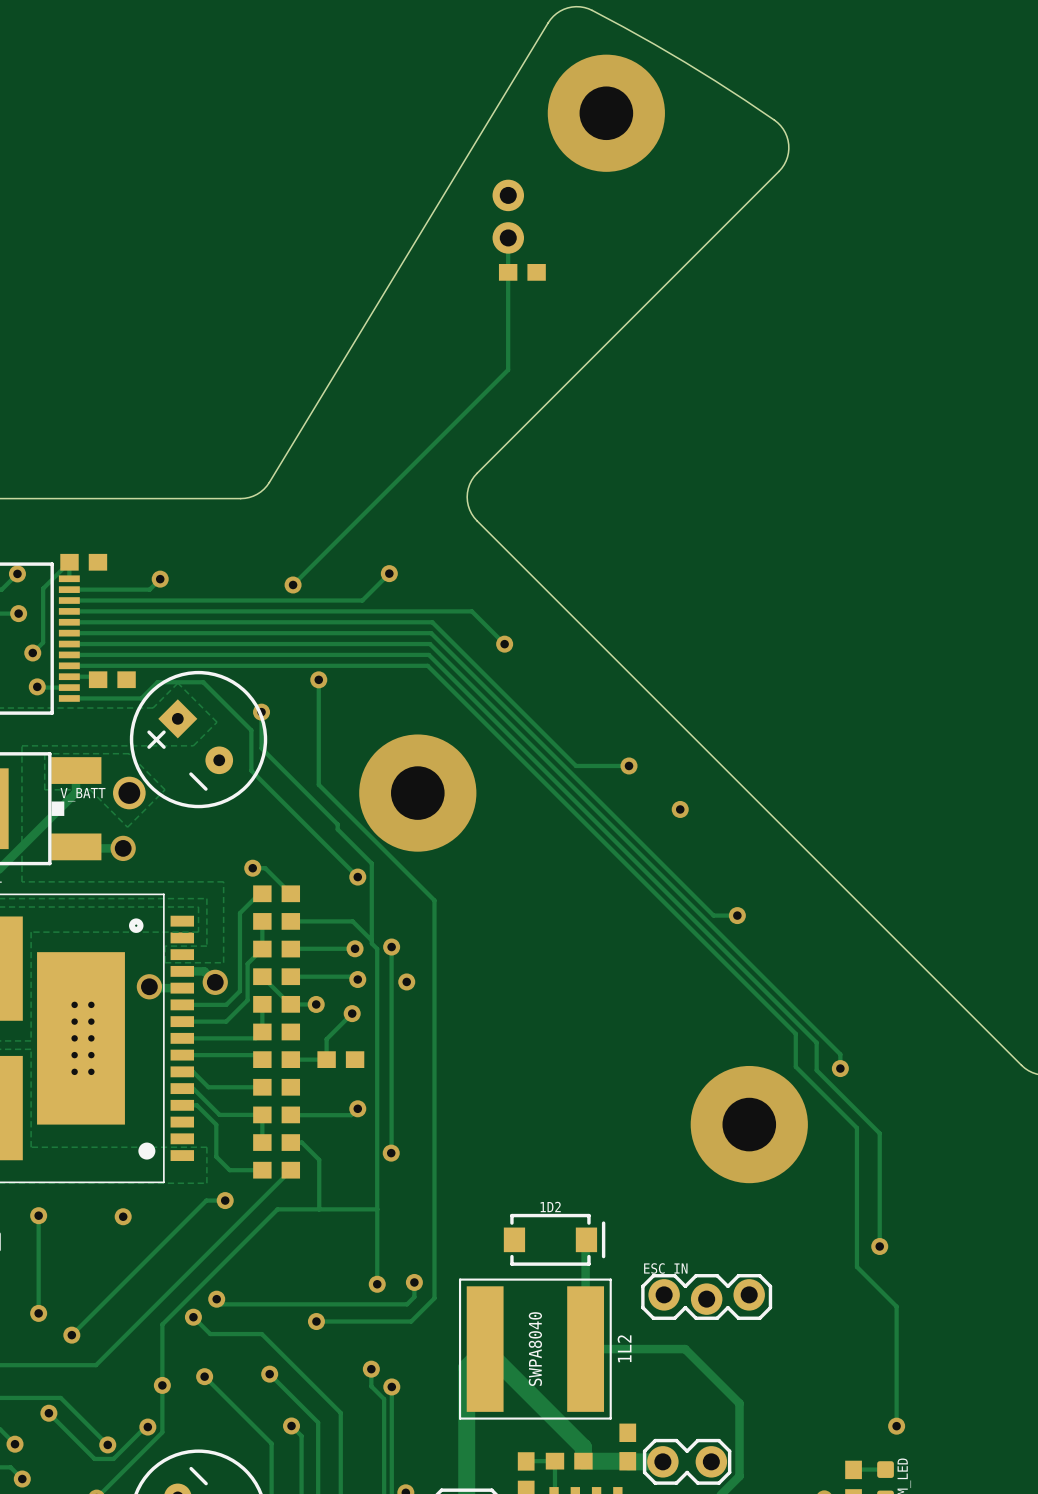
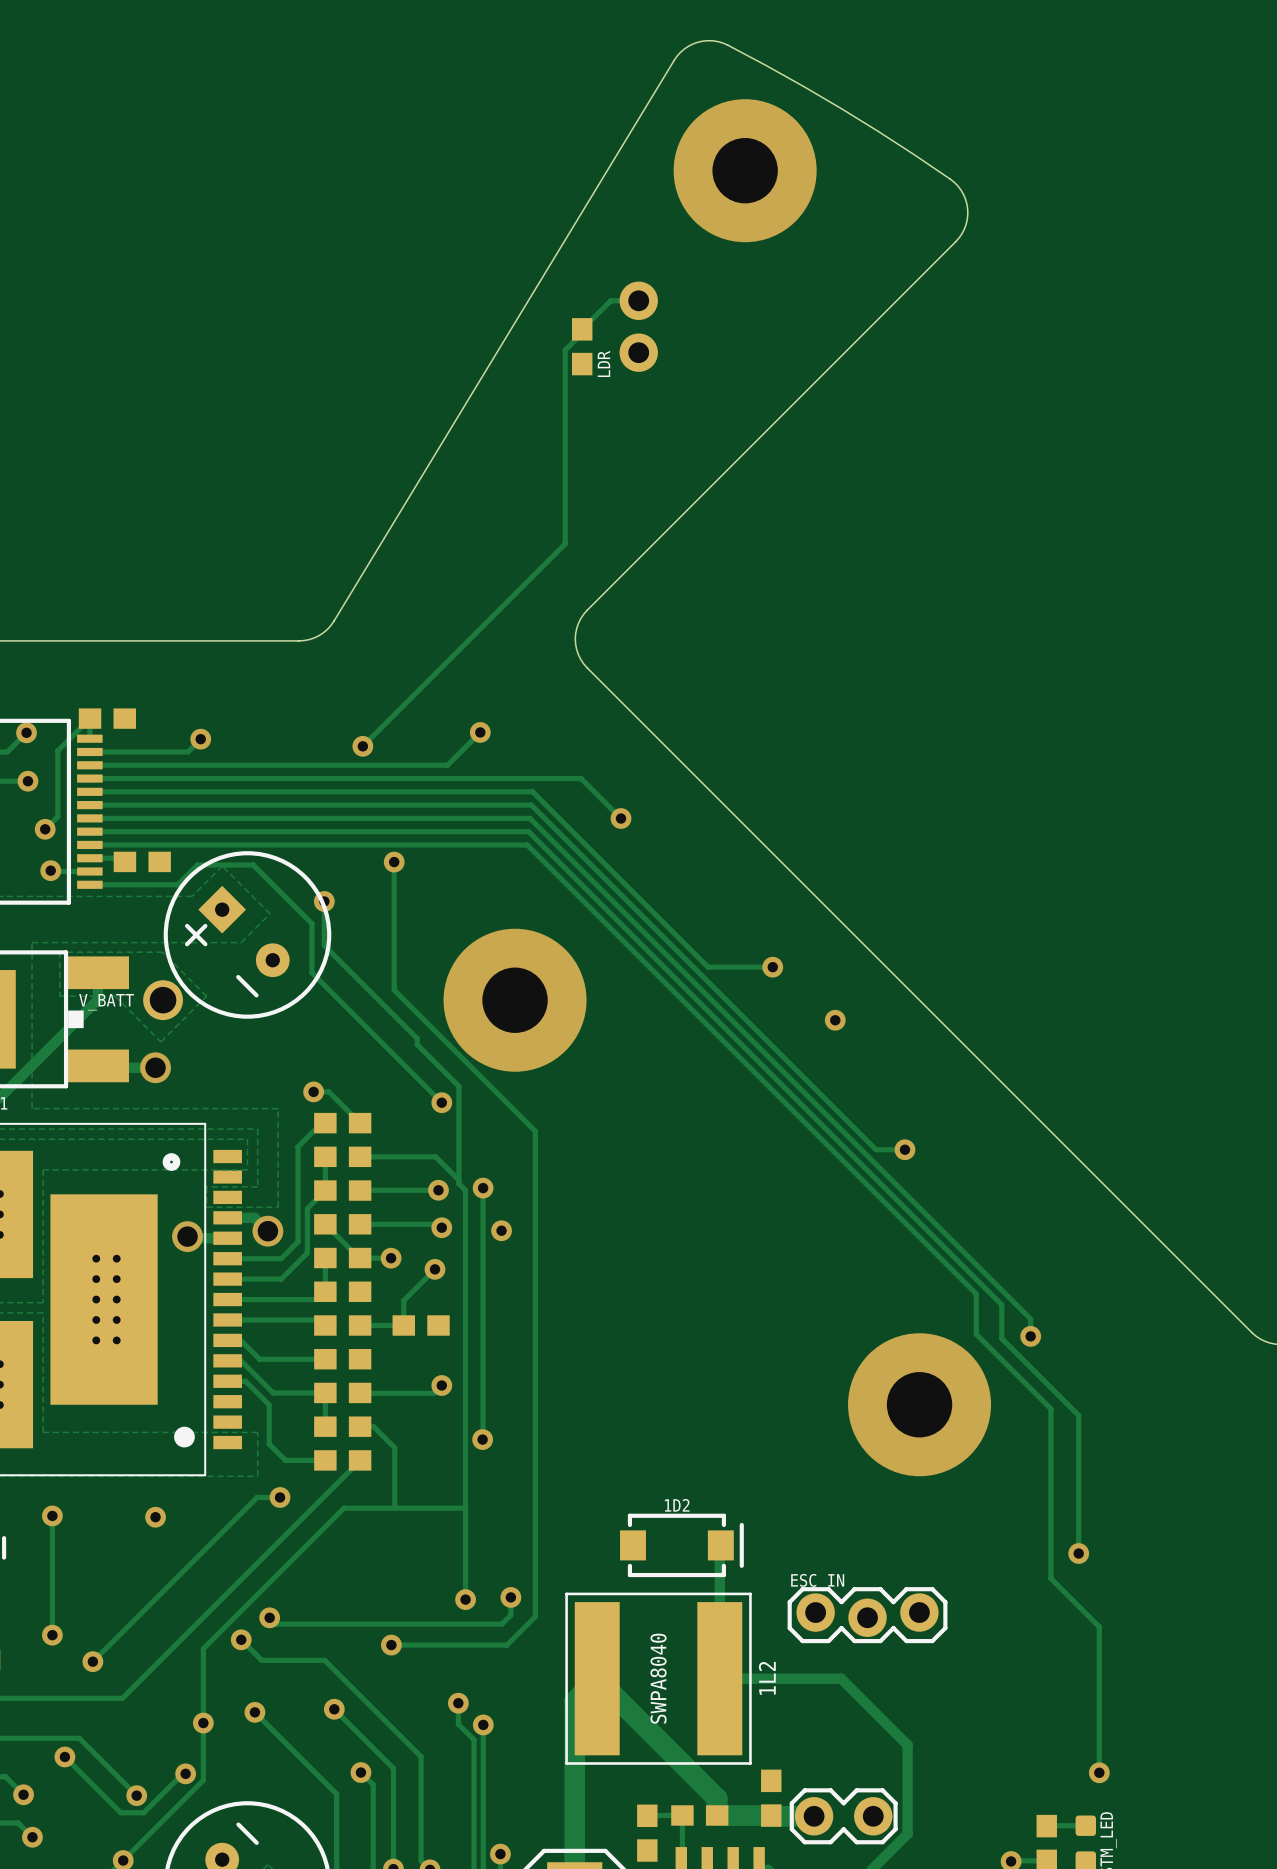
part: (508, 216) -> none
track: (508, 238) (508, 369) (458, 419) -> (638, 300) (610, 300) (582, 329) (582, 333) (565, 350) (565, 543)
LDR: none -> (638, 326)
part rotation: 0° (522, 272) -> 90° clockwise (582, 346)
part position: (522, 272) -> (582, 346)

